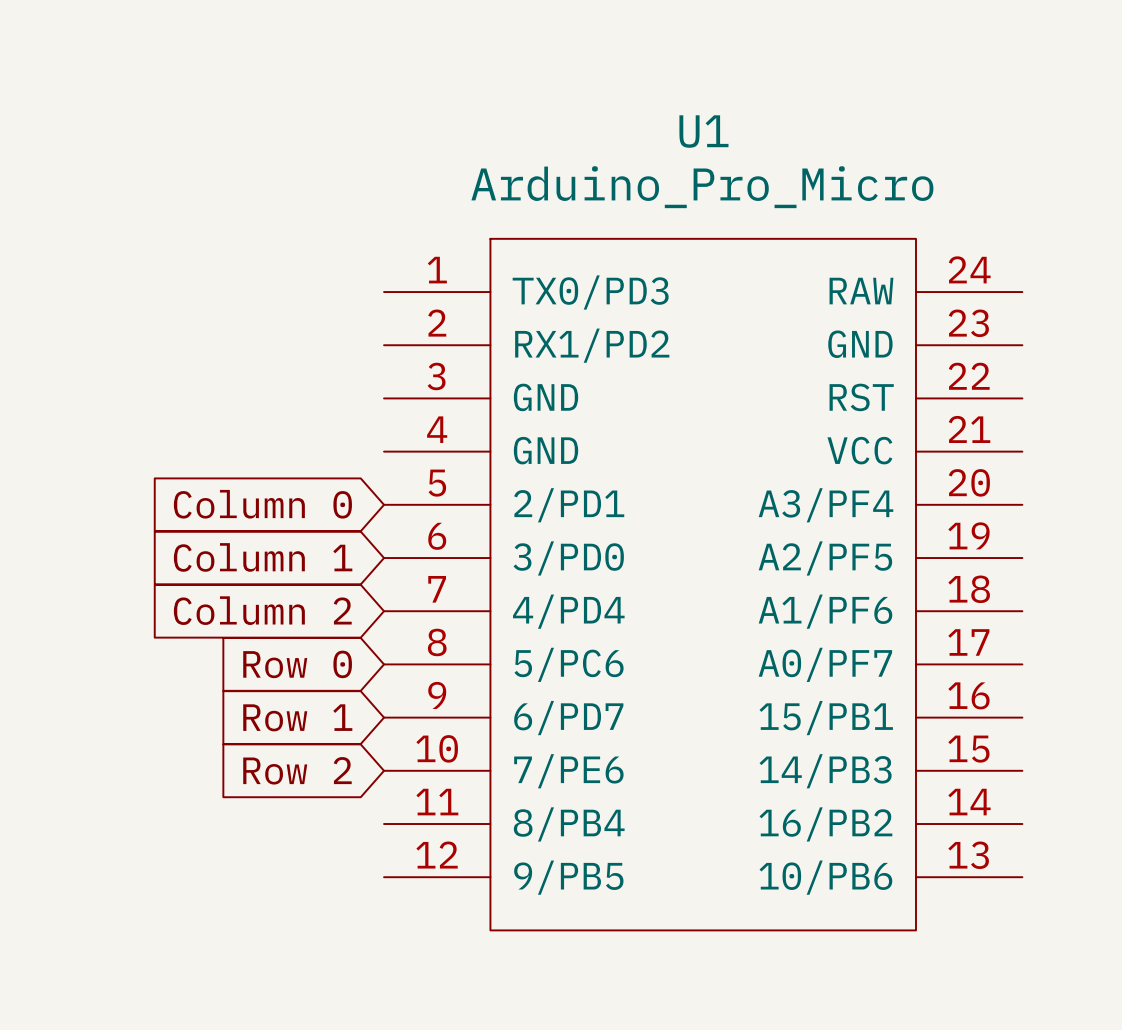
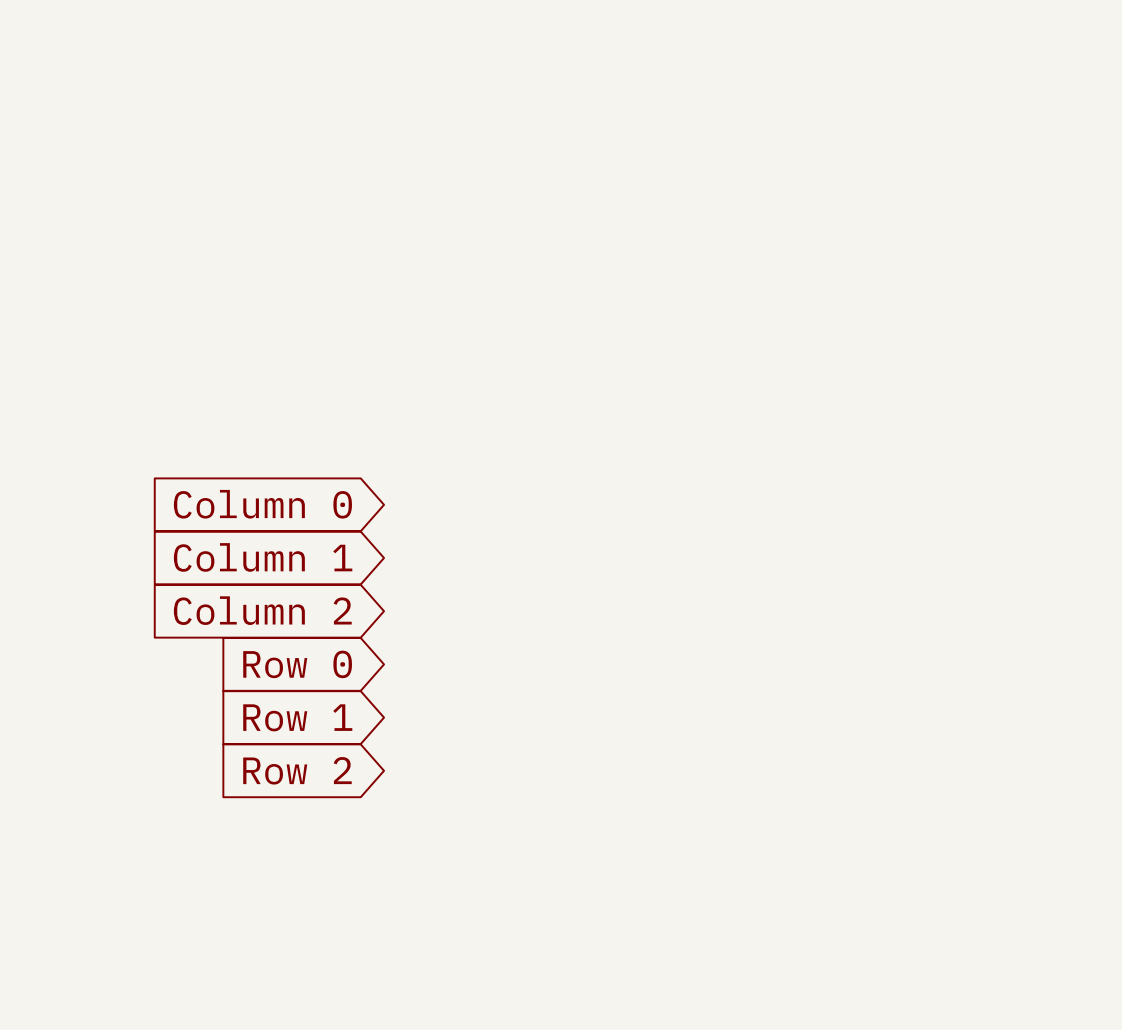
U1: Arduino_Pro_Micro (703, 584) -> none

